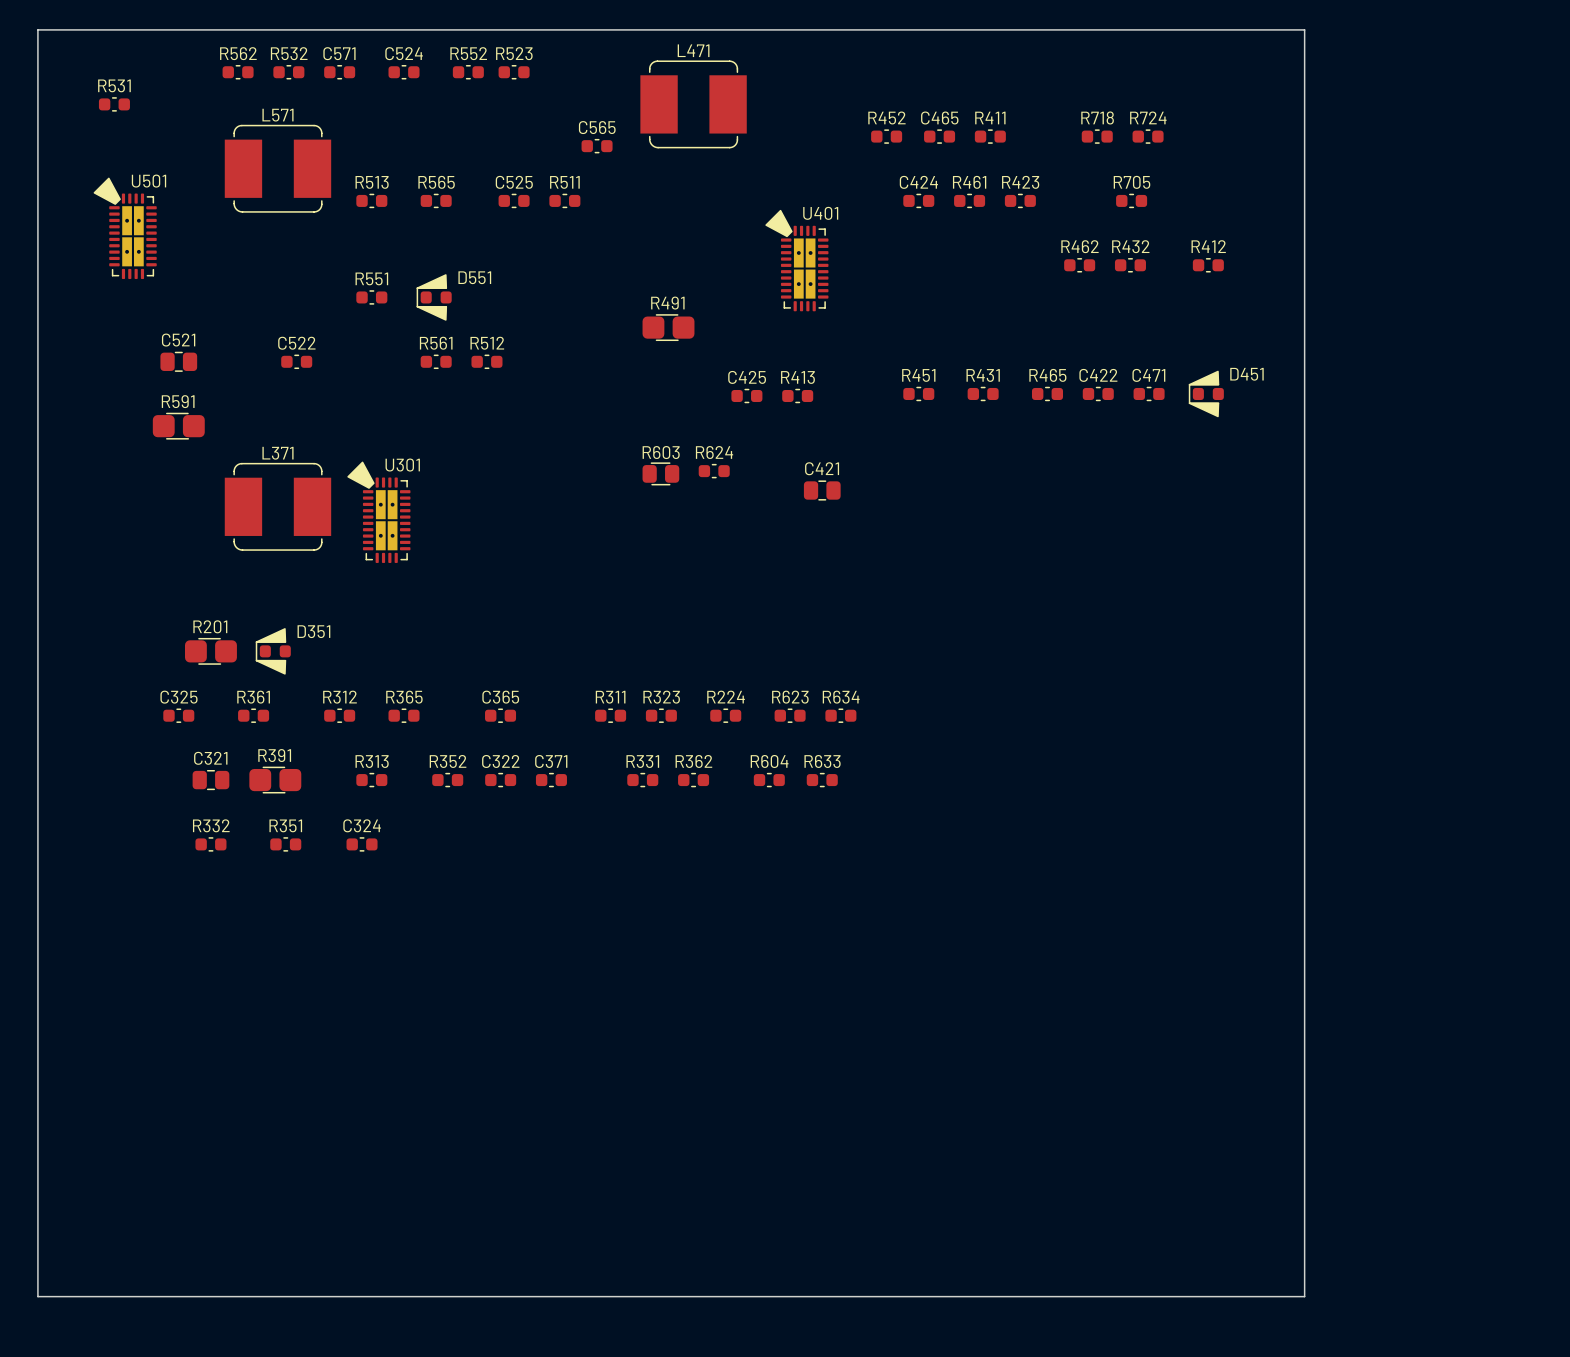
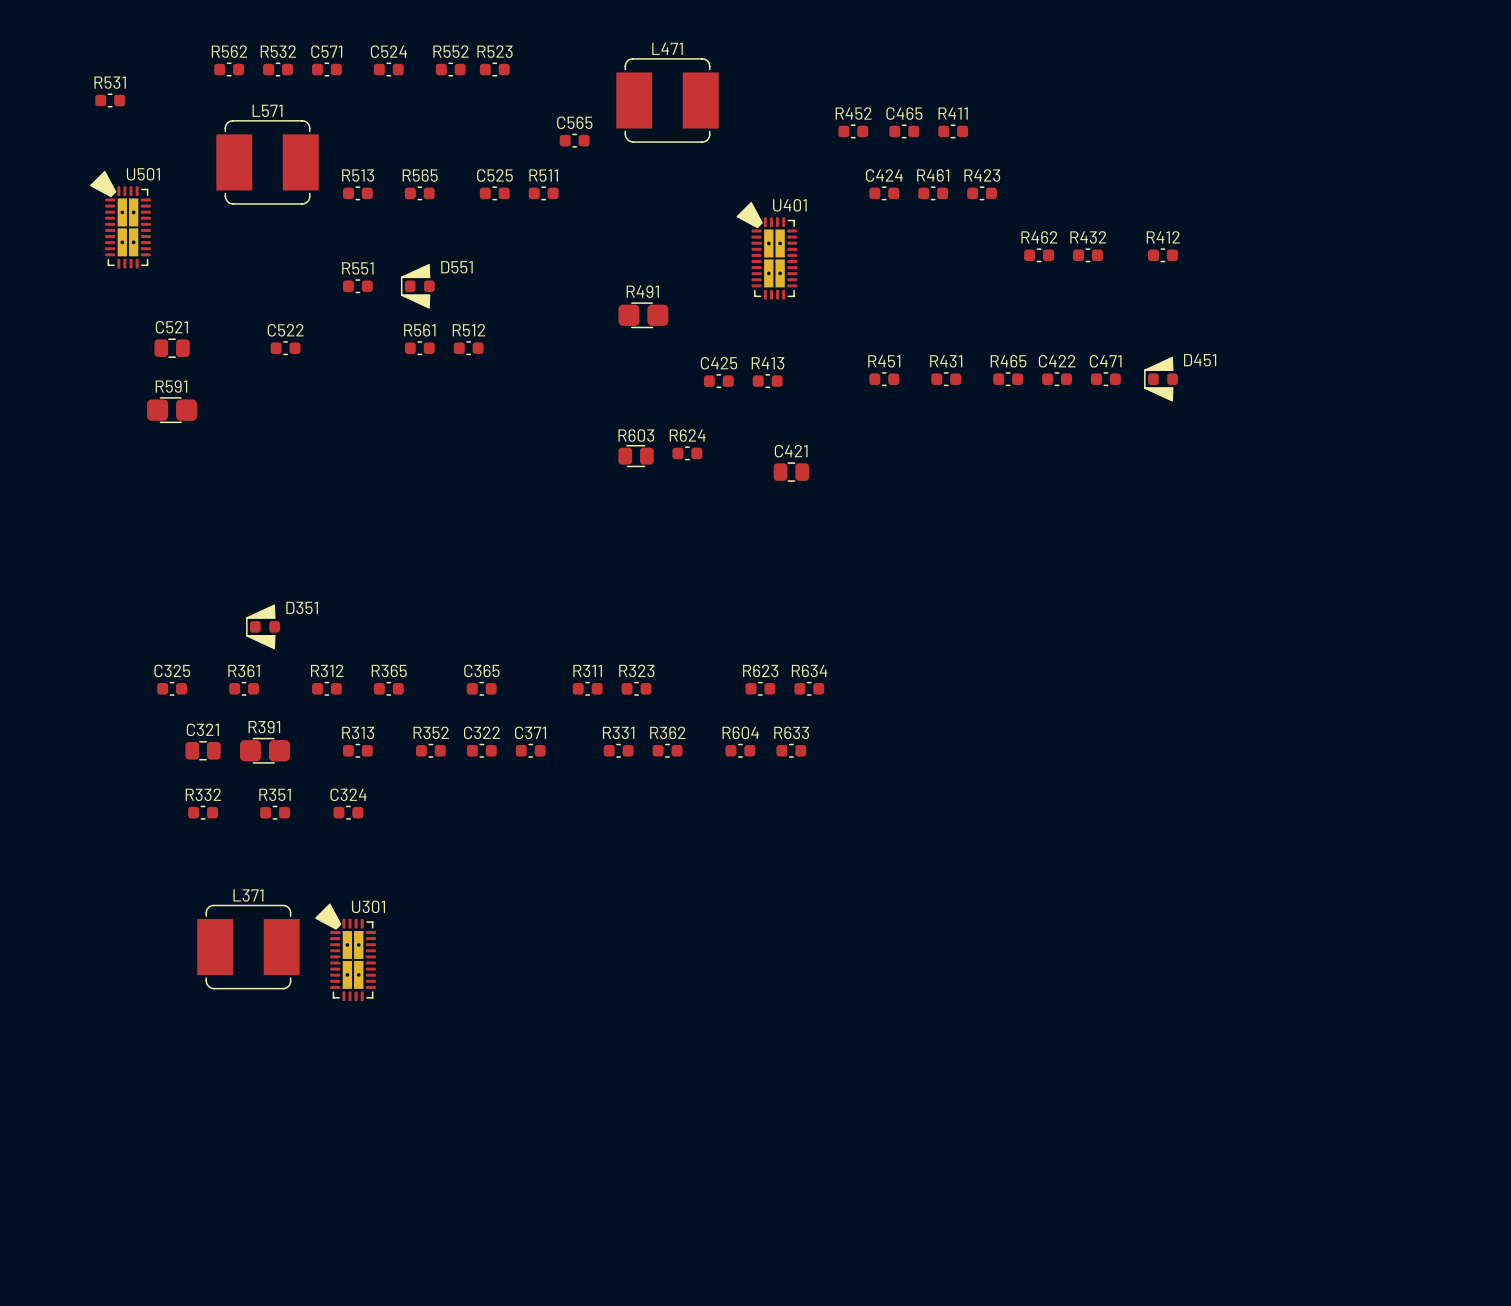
board edge: (37, 29) (37, 1296) (1304, 1296) (1304, 29) (37, 29) -> none
R718: (1097, 136) -> none
R724: (1148, 136) -> none
R705: (1131, 200) -> none
L371 position: (277, 506) -> (248, 947)
U301 position: (378, 512) -> (345, 952)
R201: (210, 651) -> none
R224: (725, 715) -> none

